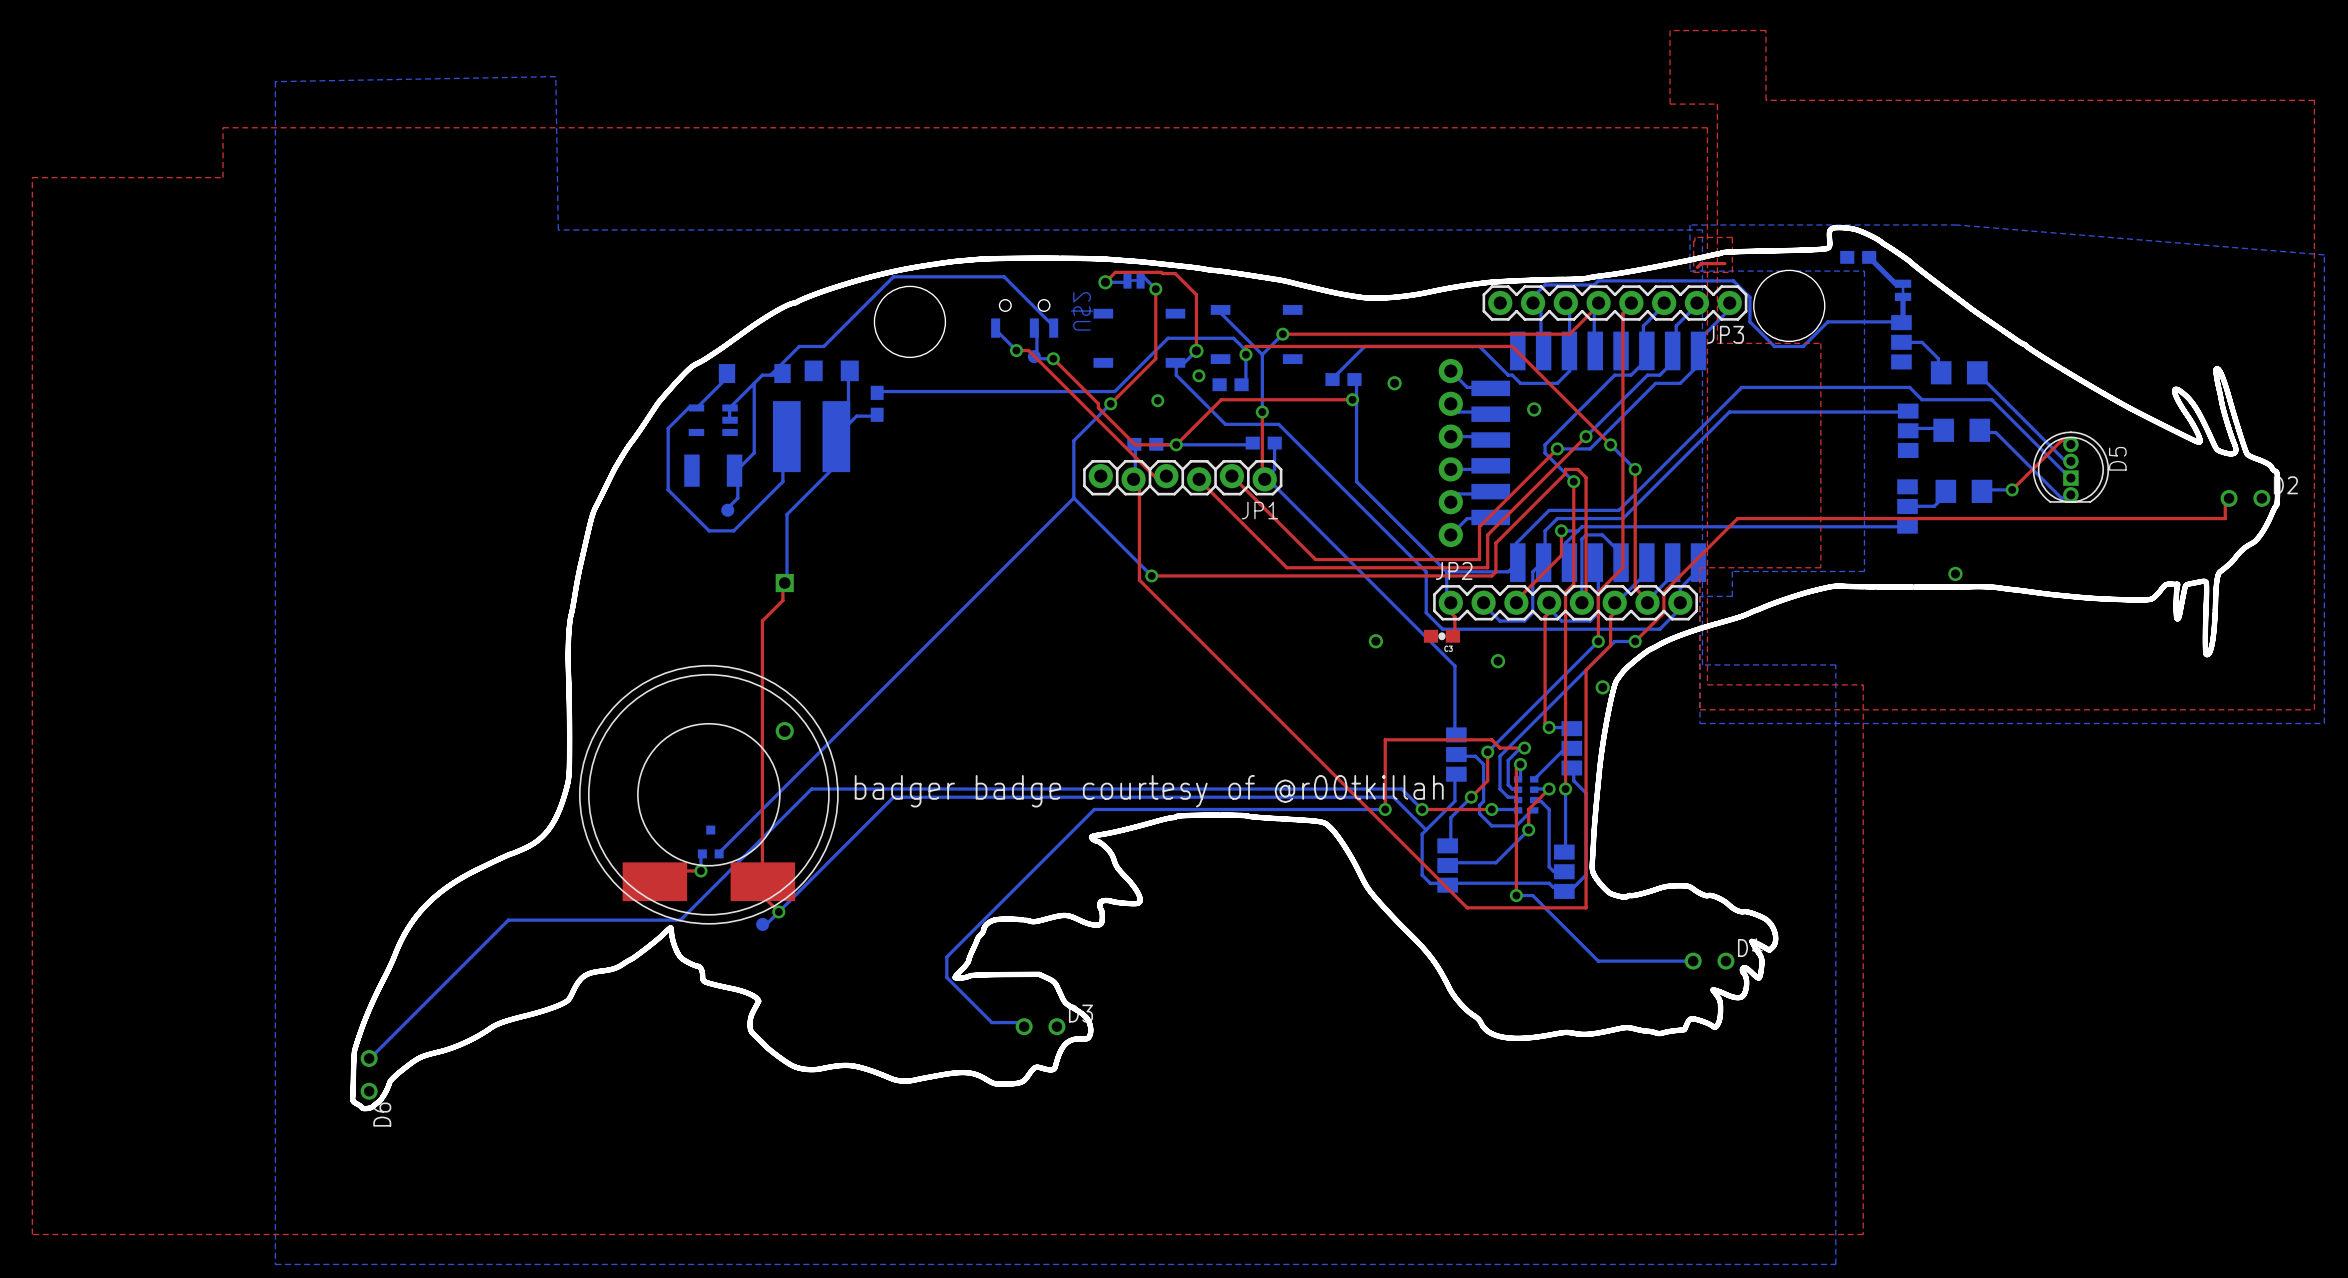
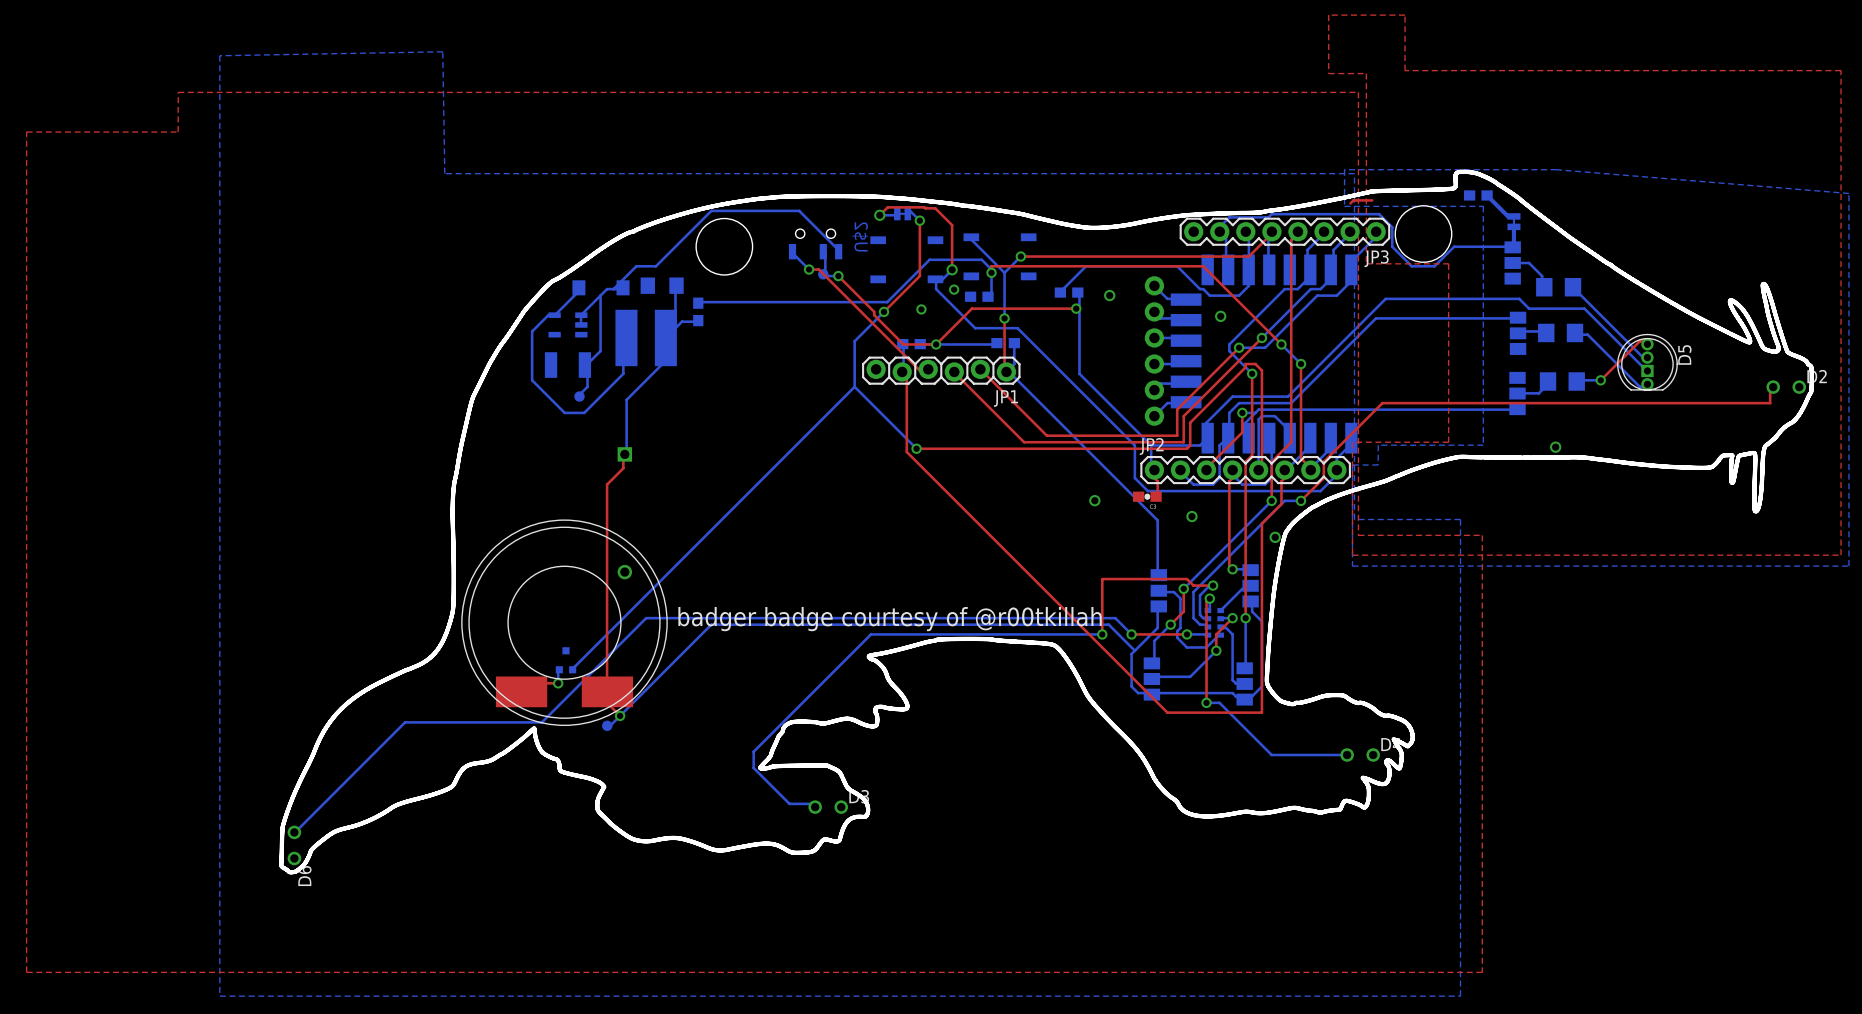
top zone outline: (1694, 237) (1732, 237) (1732, 272) (1693, 272) (1694, 237) -> none

